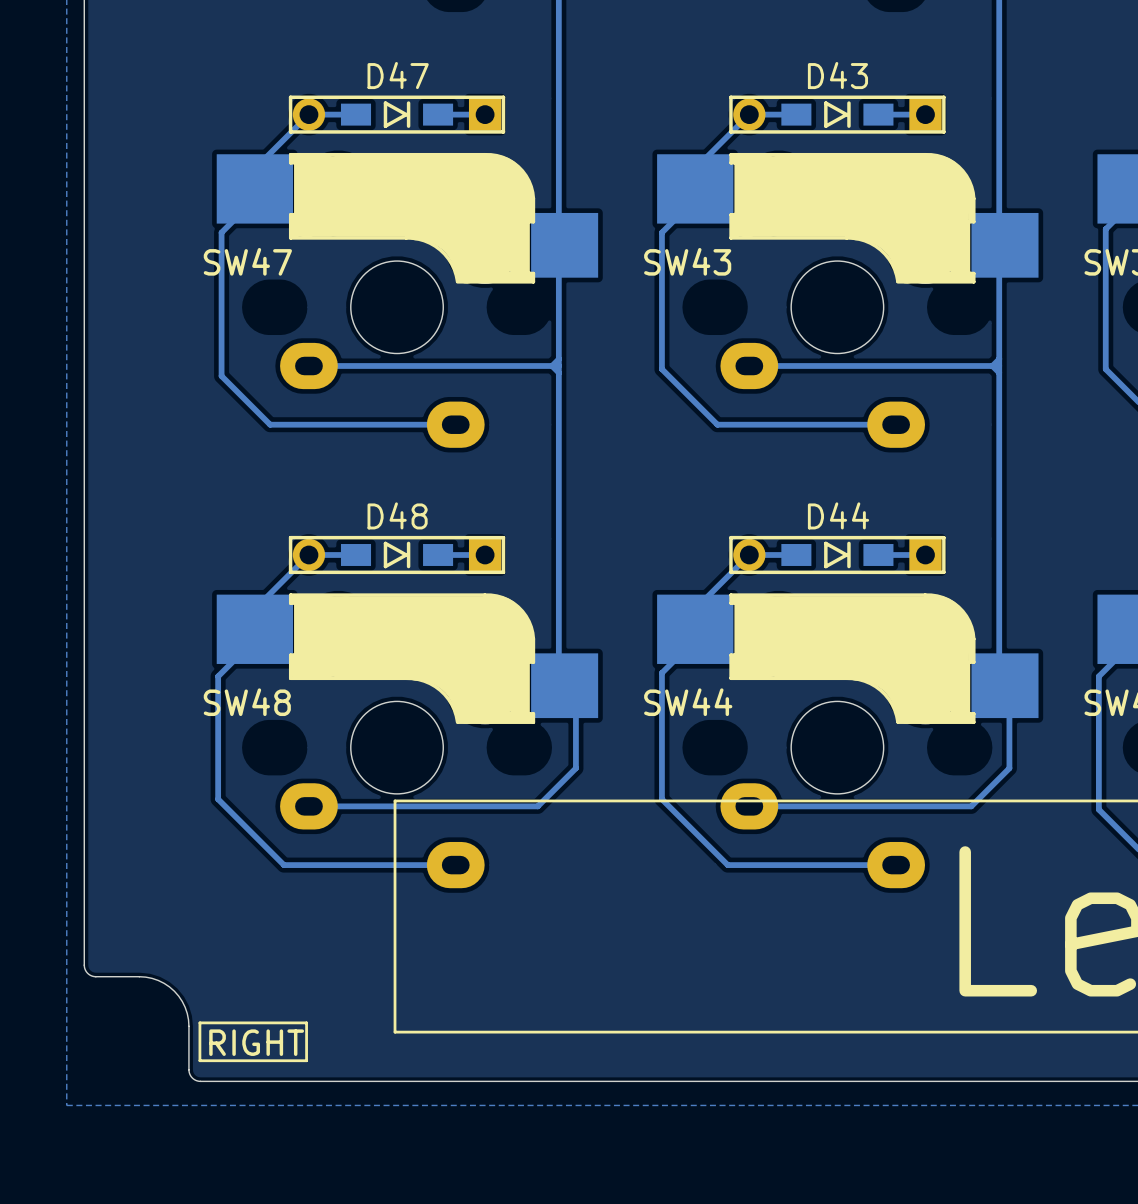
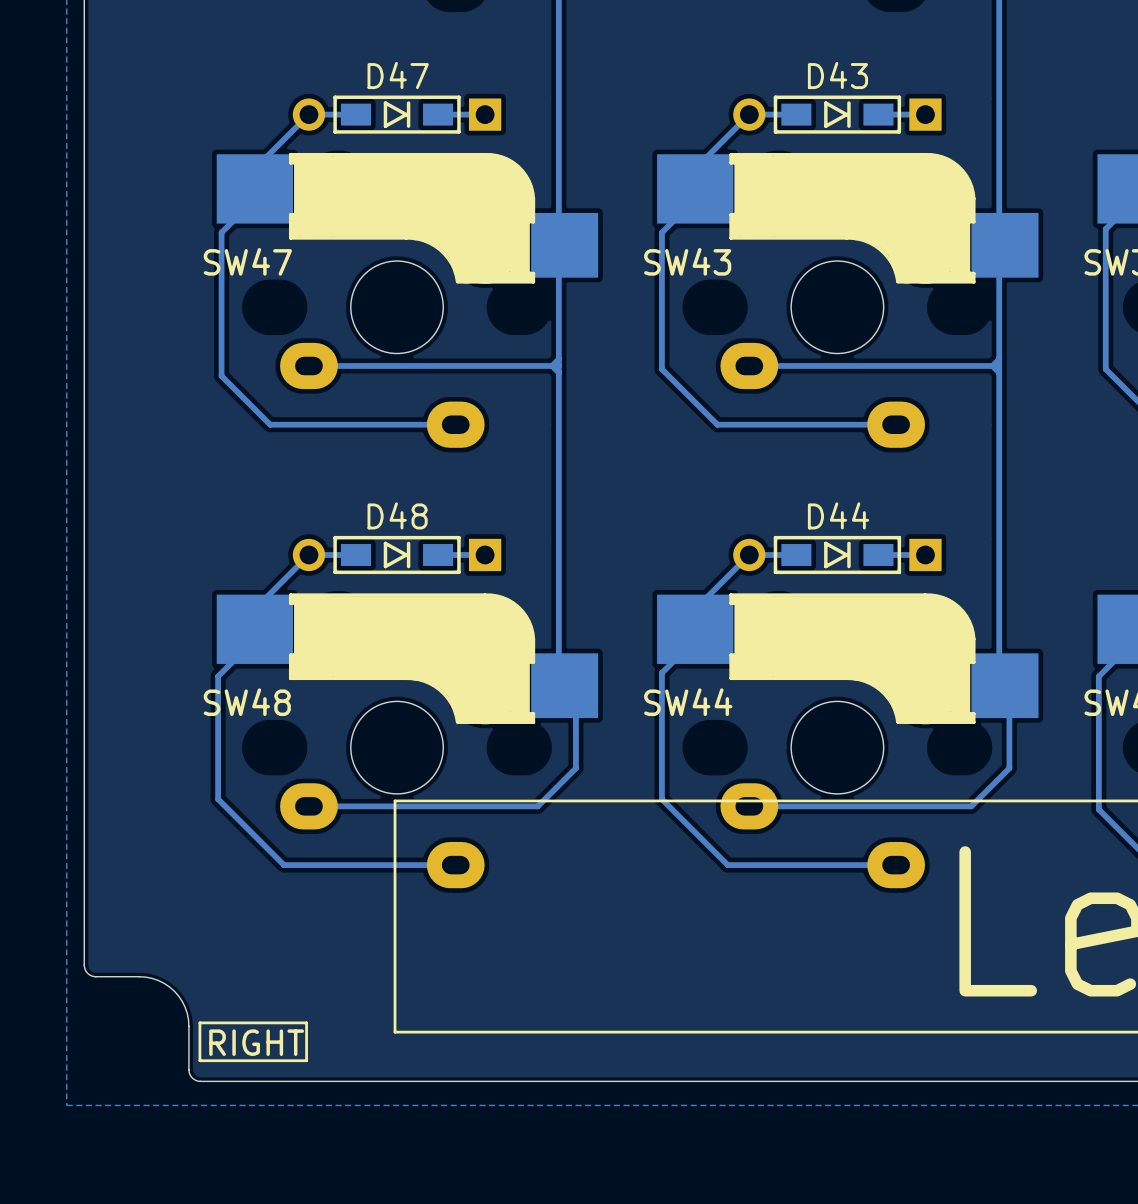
D47 footprint: [288, 95, 506, 134] -> [292, 95, 502, 134]
D43 footprint: [729, 95, 946, 134] -> [733, 95, 942, 134]
D48 footprint: [288, 535, 506, 575] -> [292, 535, 502, 575]
D44 footprint: [729, 535, 946, 575] -> [733, 535, 942, 575]

